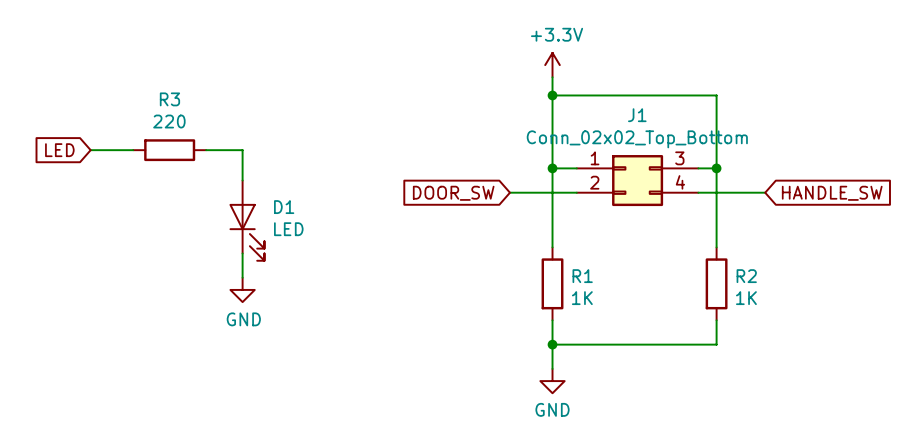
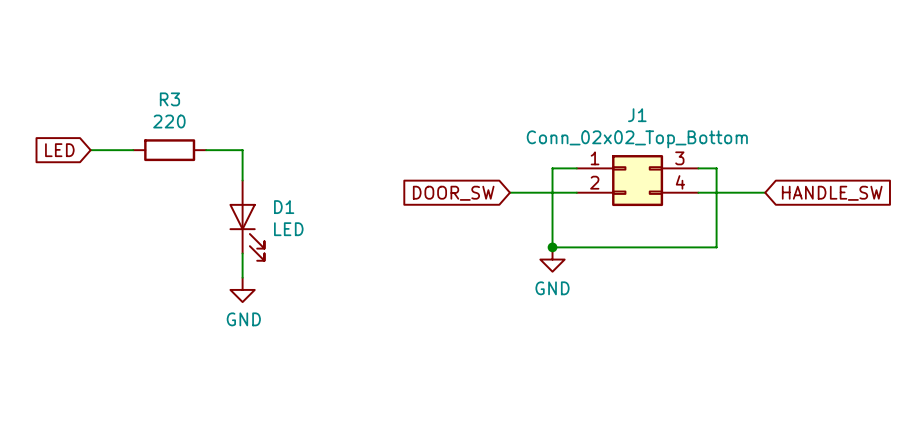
power symbol: +3.3V (552, 65) -> none
wire: (552, 77) (552, 168) -> none
wire: (552, 95) (716, 95) (716, 168) -> none
junction: (552, 95) -> none
junction: (552, 168) -> none
junction: (716, 168) -> none
wire: none -> (552, 247) (716, 247)
junction: none -> (552, 247)
R1: 1K (552, 283) -> none
R2: 1K (716, 283) -> none
wire: (552, 320) (552, 368) -> none
wire: (716, 320) (716, 344) (552, 344) -> none
junction: (552, 344) -> none
power symbol position: GND (552, 381) -> GND (552, 259)

